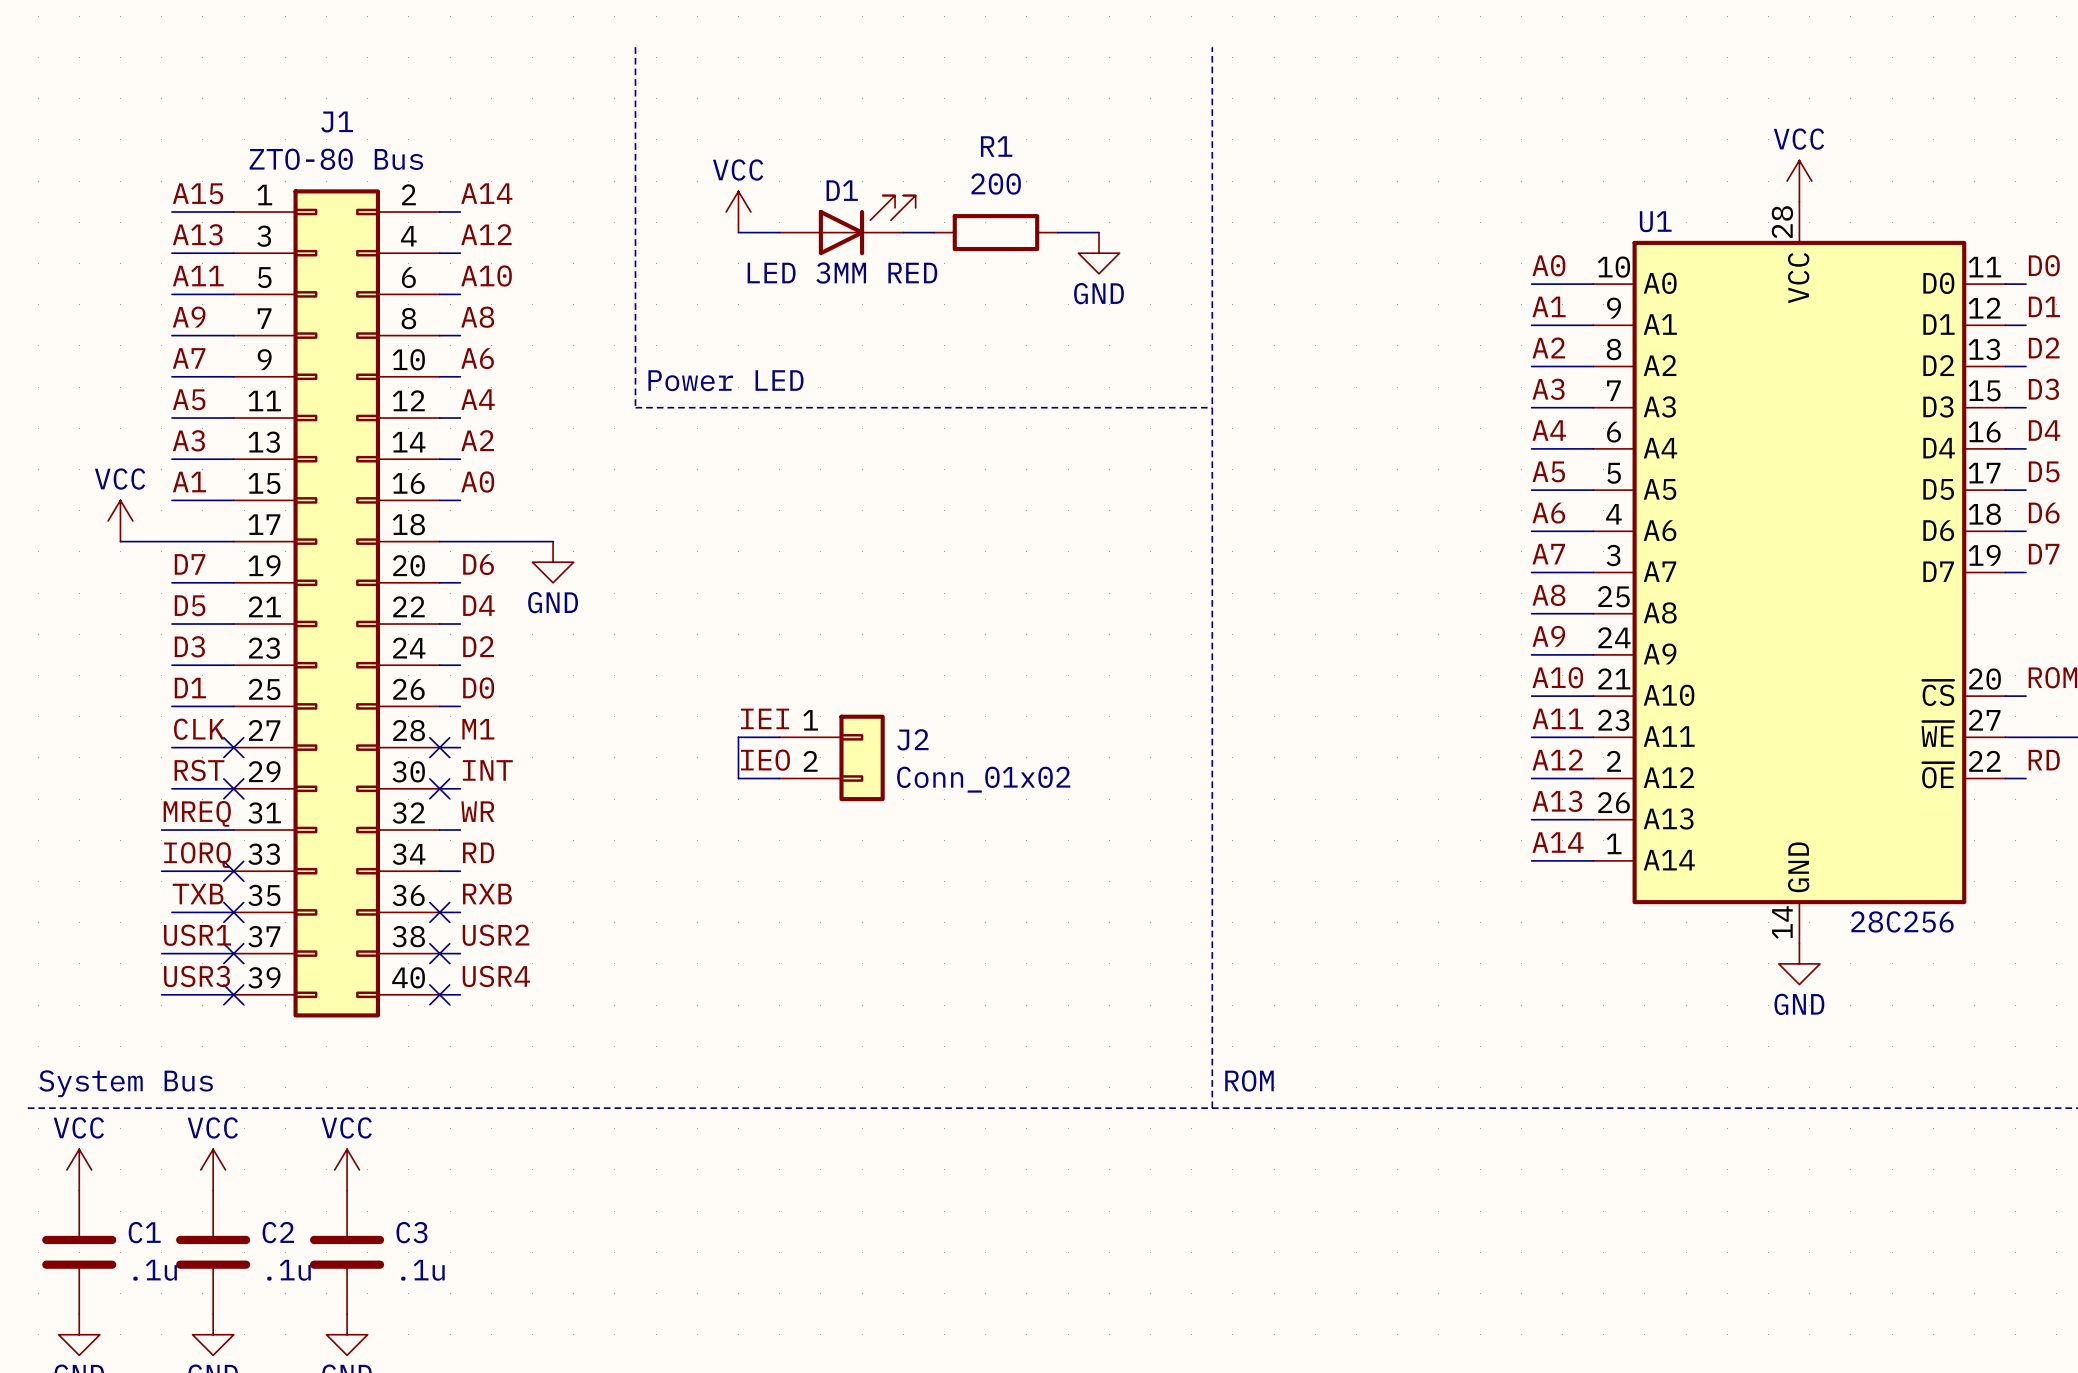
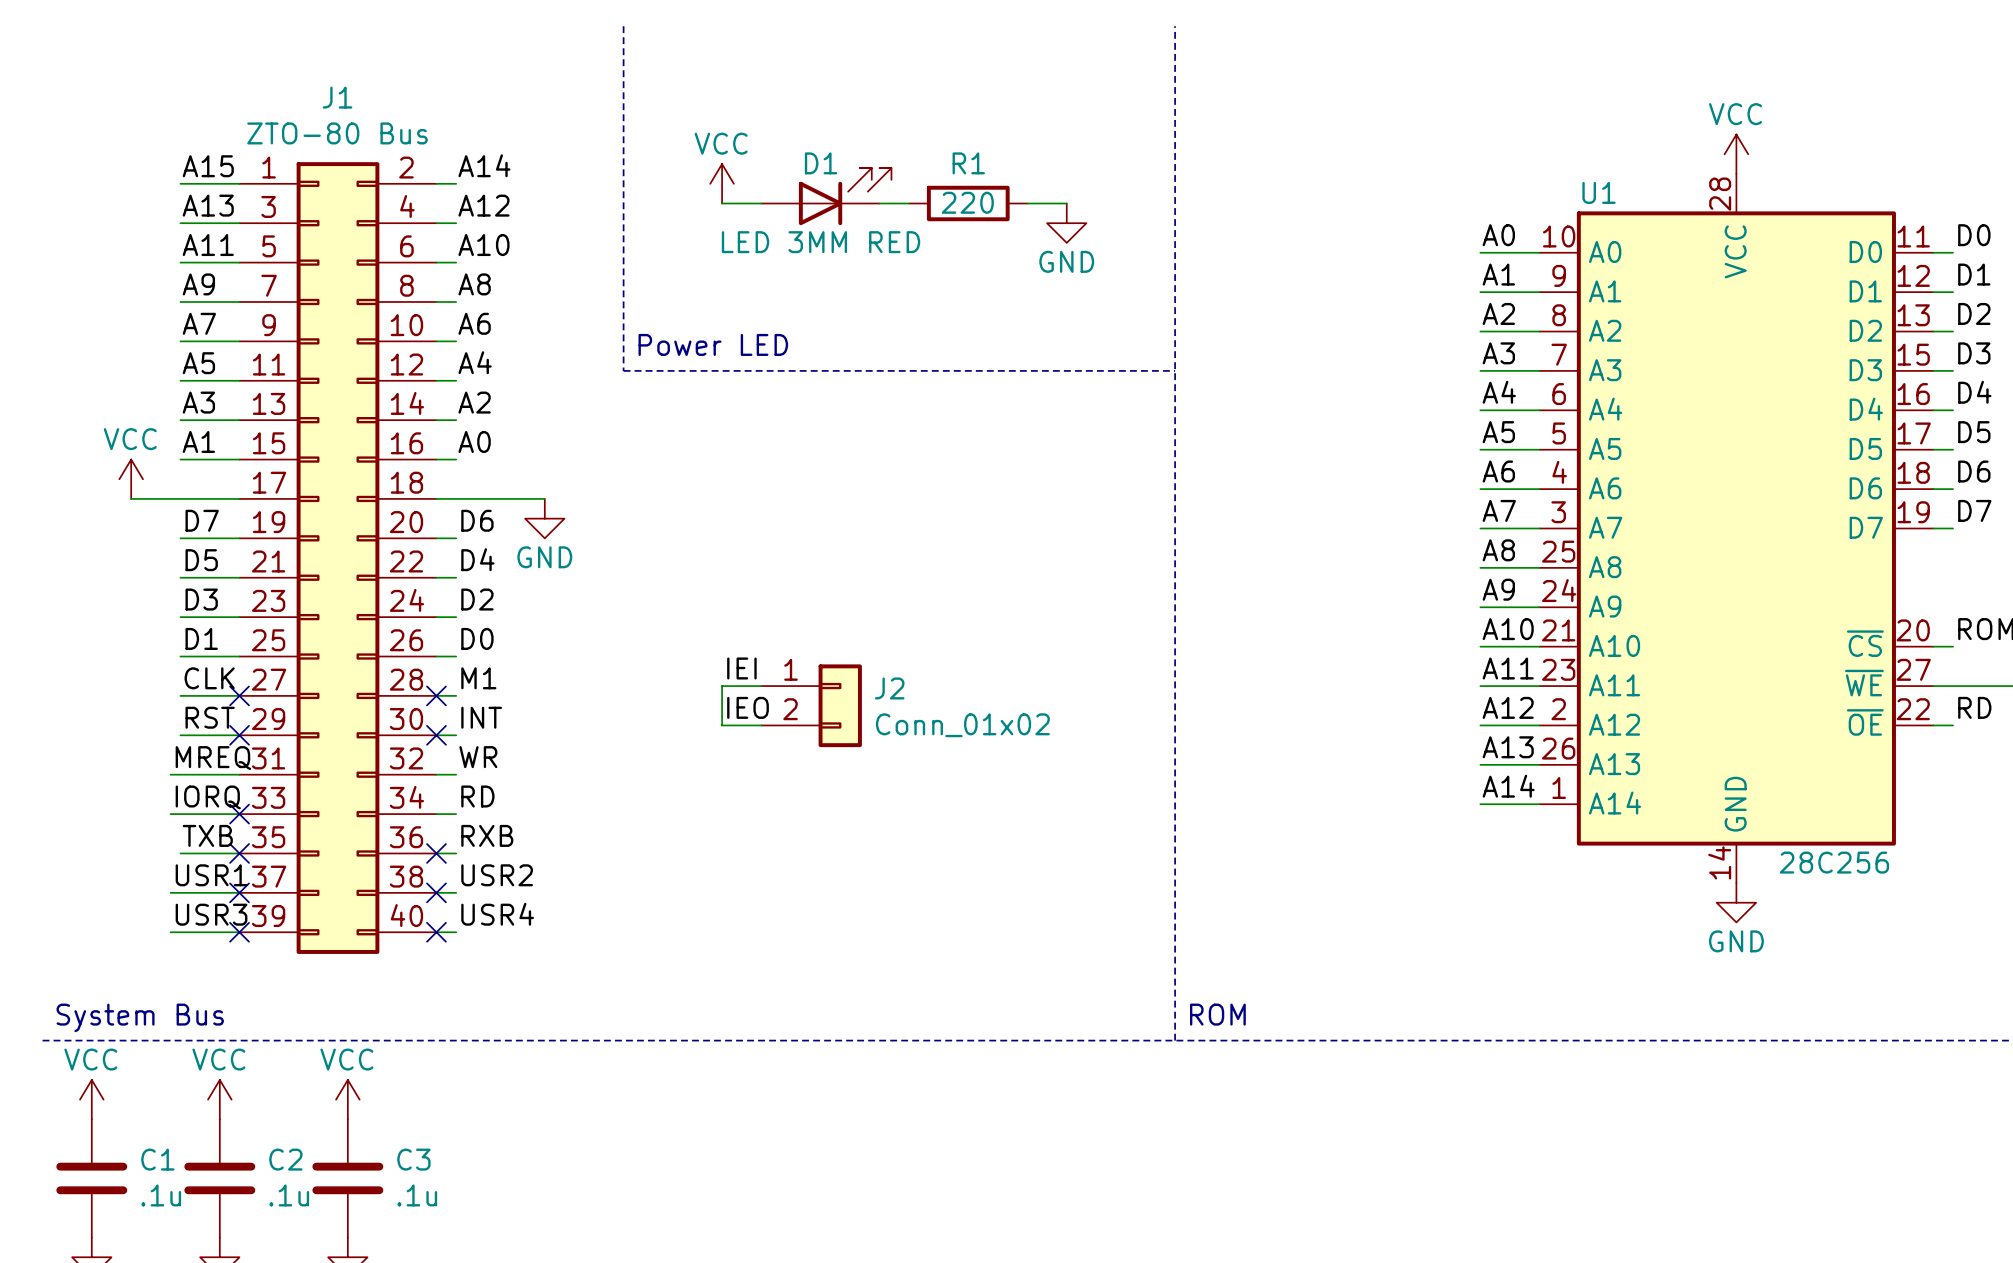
R1 name position: R1 (996, 146) -> R1 (968, 163)
R1 value: 200 (996, 184) -> 220 (967, 202)

